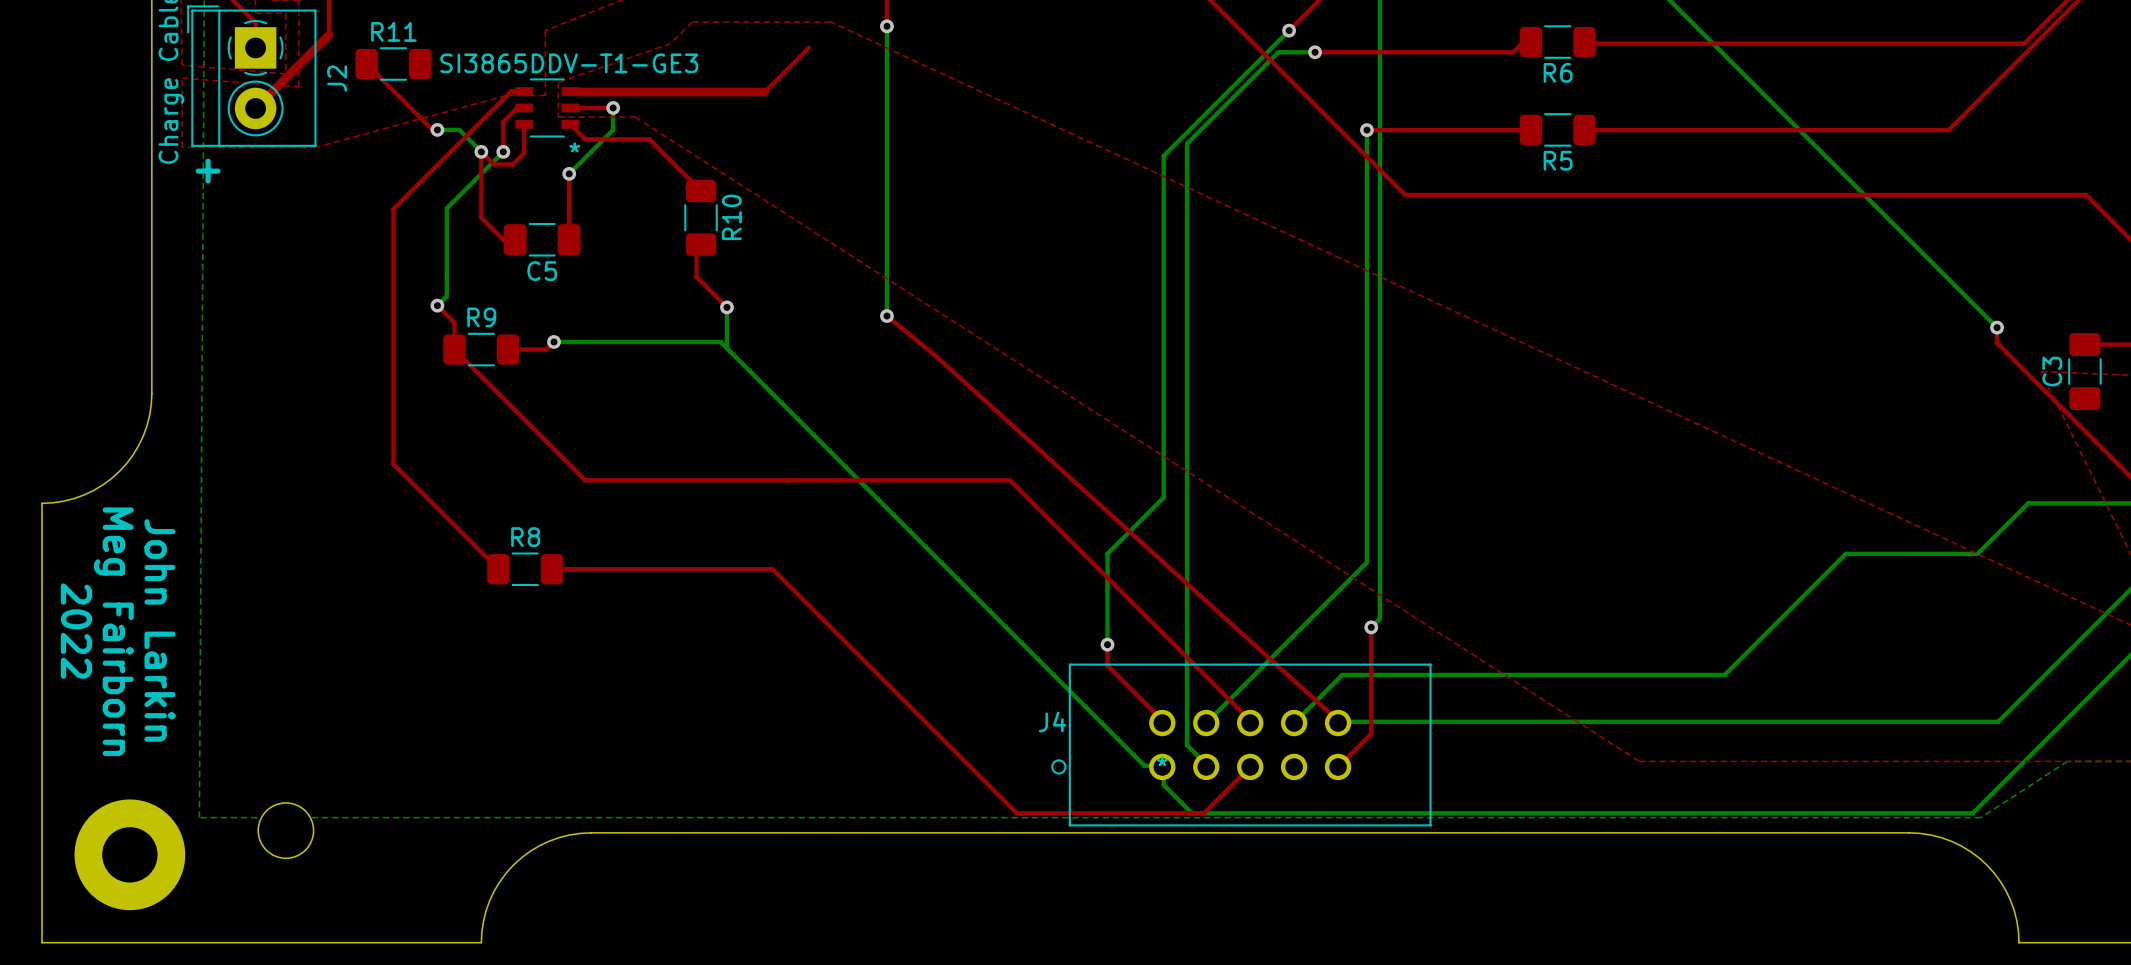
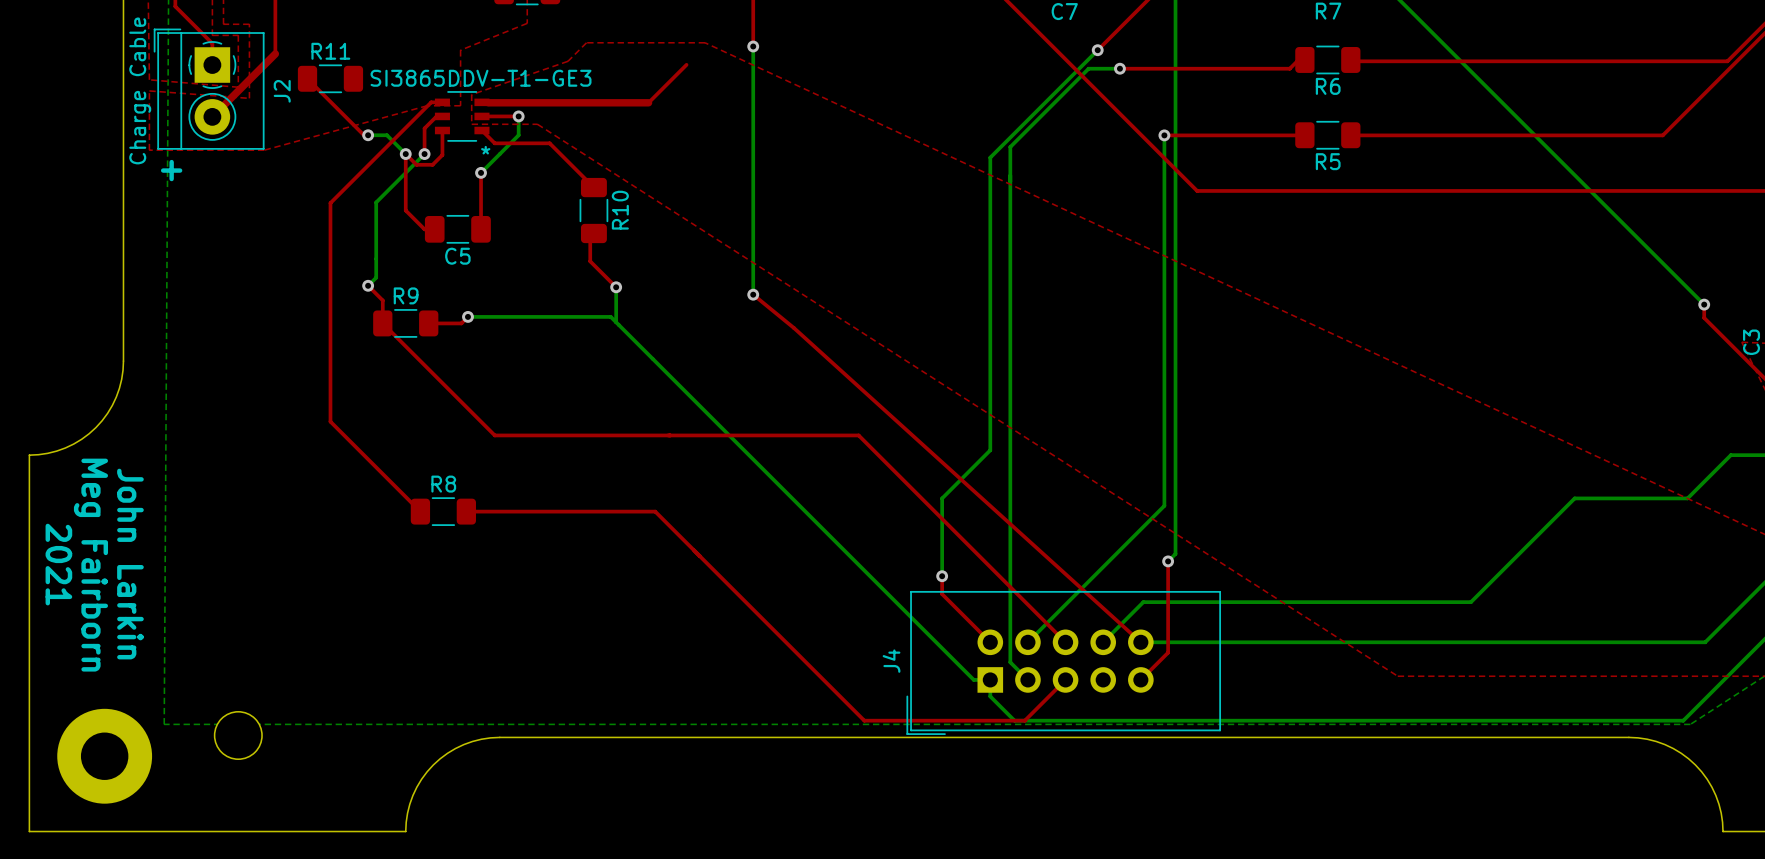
text: 2022 (76, 631) -> 2021 (58, 564)
J4 footprint: [1051, 663, 1432, 827] -> [906, 590, 1222, 735]

